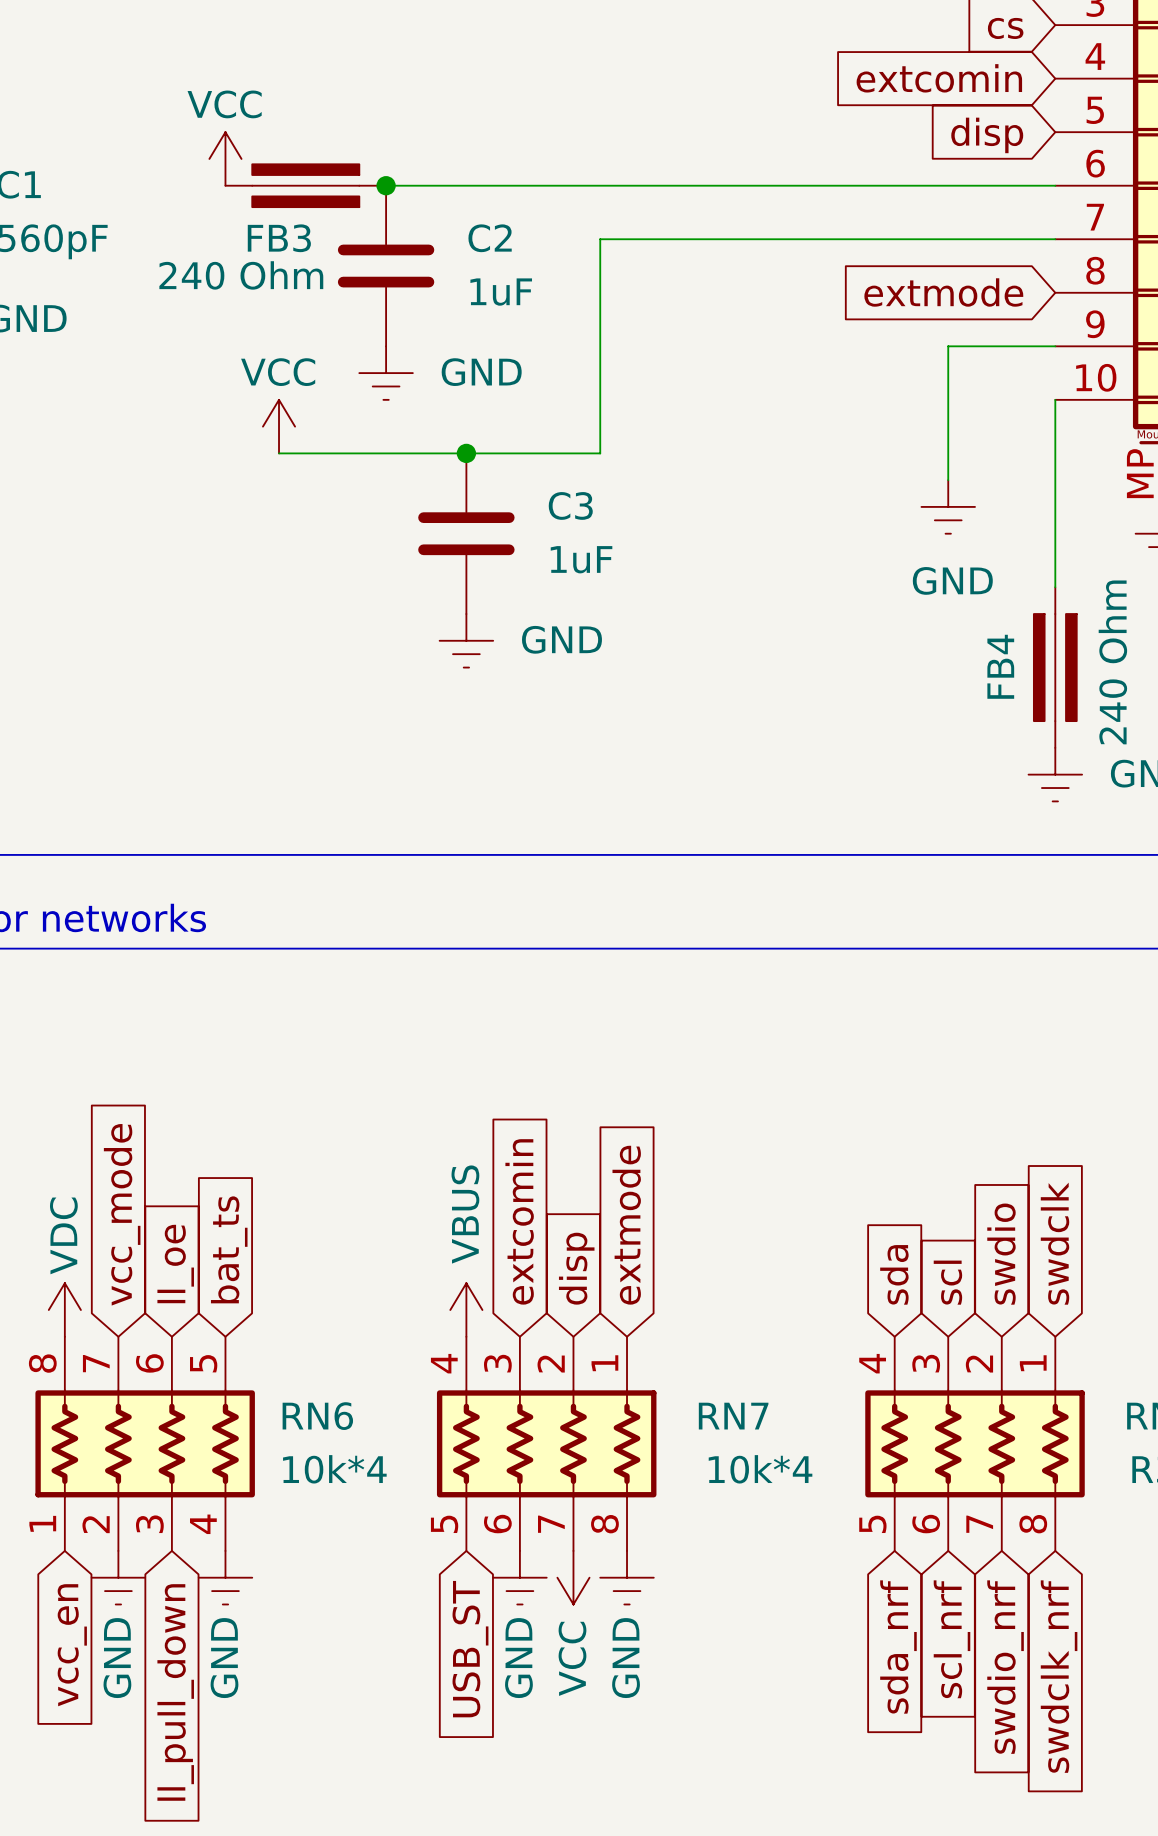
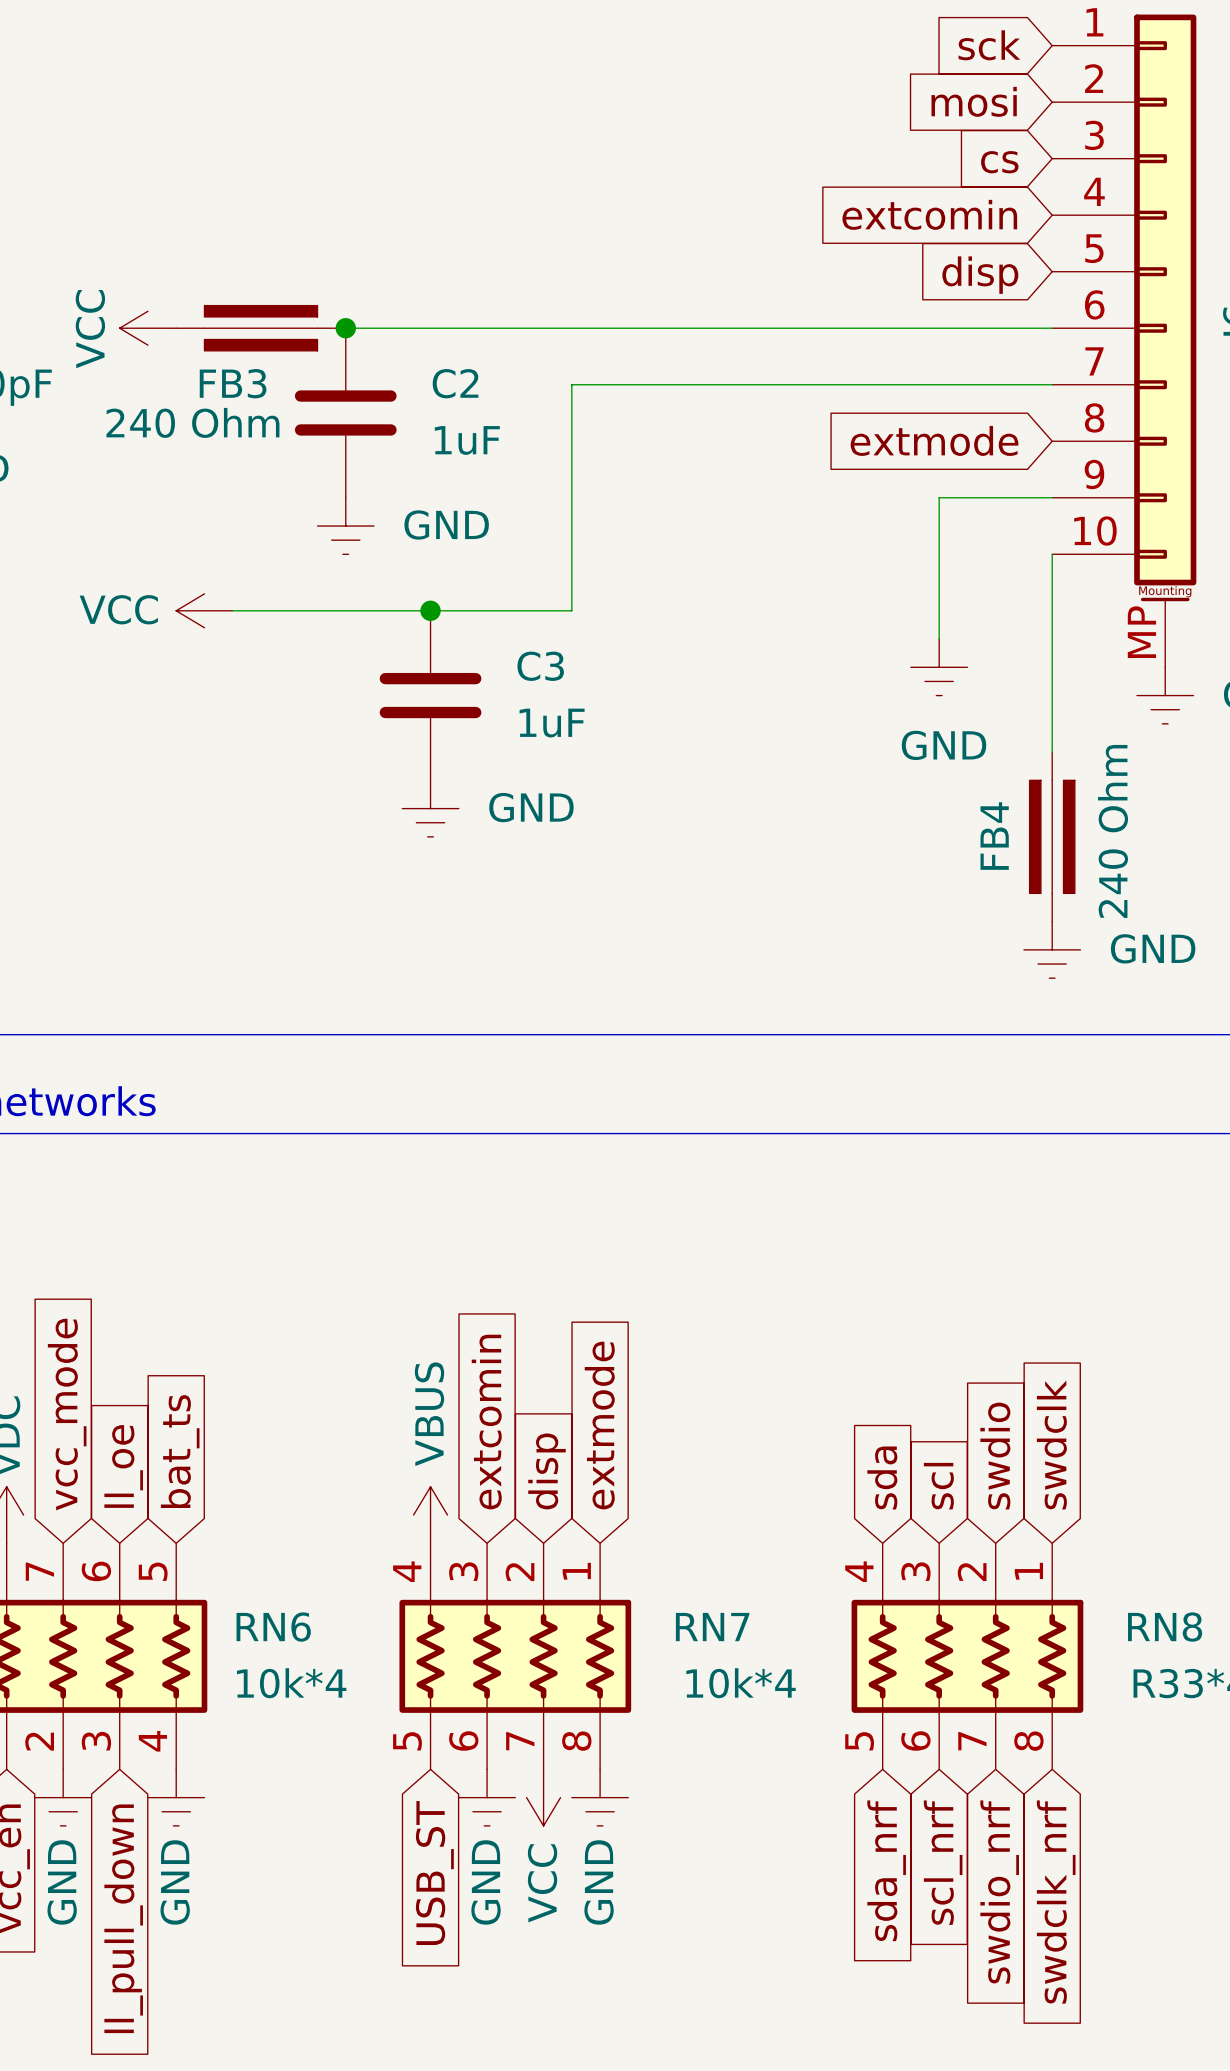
power symbol rotation: 0° (225, 158) -> 90° counterclockwise (147, 328)
power symbol position: VCC (225, 158) -> VCC (147, 328)
power symbol rotation: 0° (279, 426) -> 90° counterclockwise (204, 610)
power symbol position: VCC (279, 426) -> VCC (204, 610)

